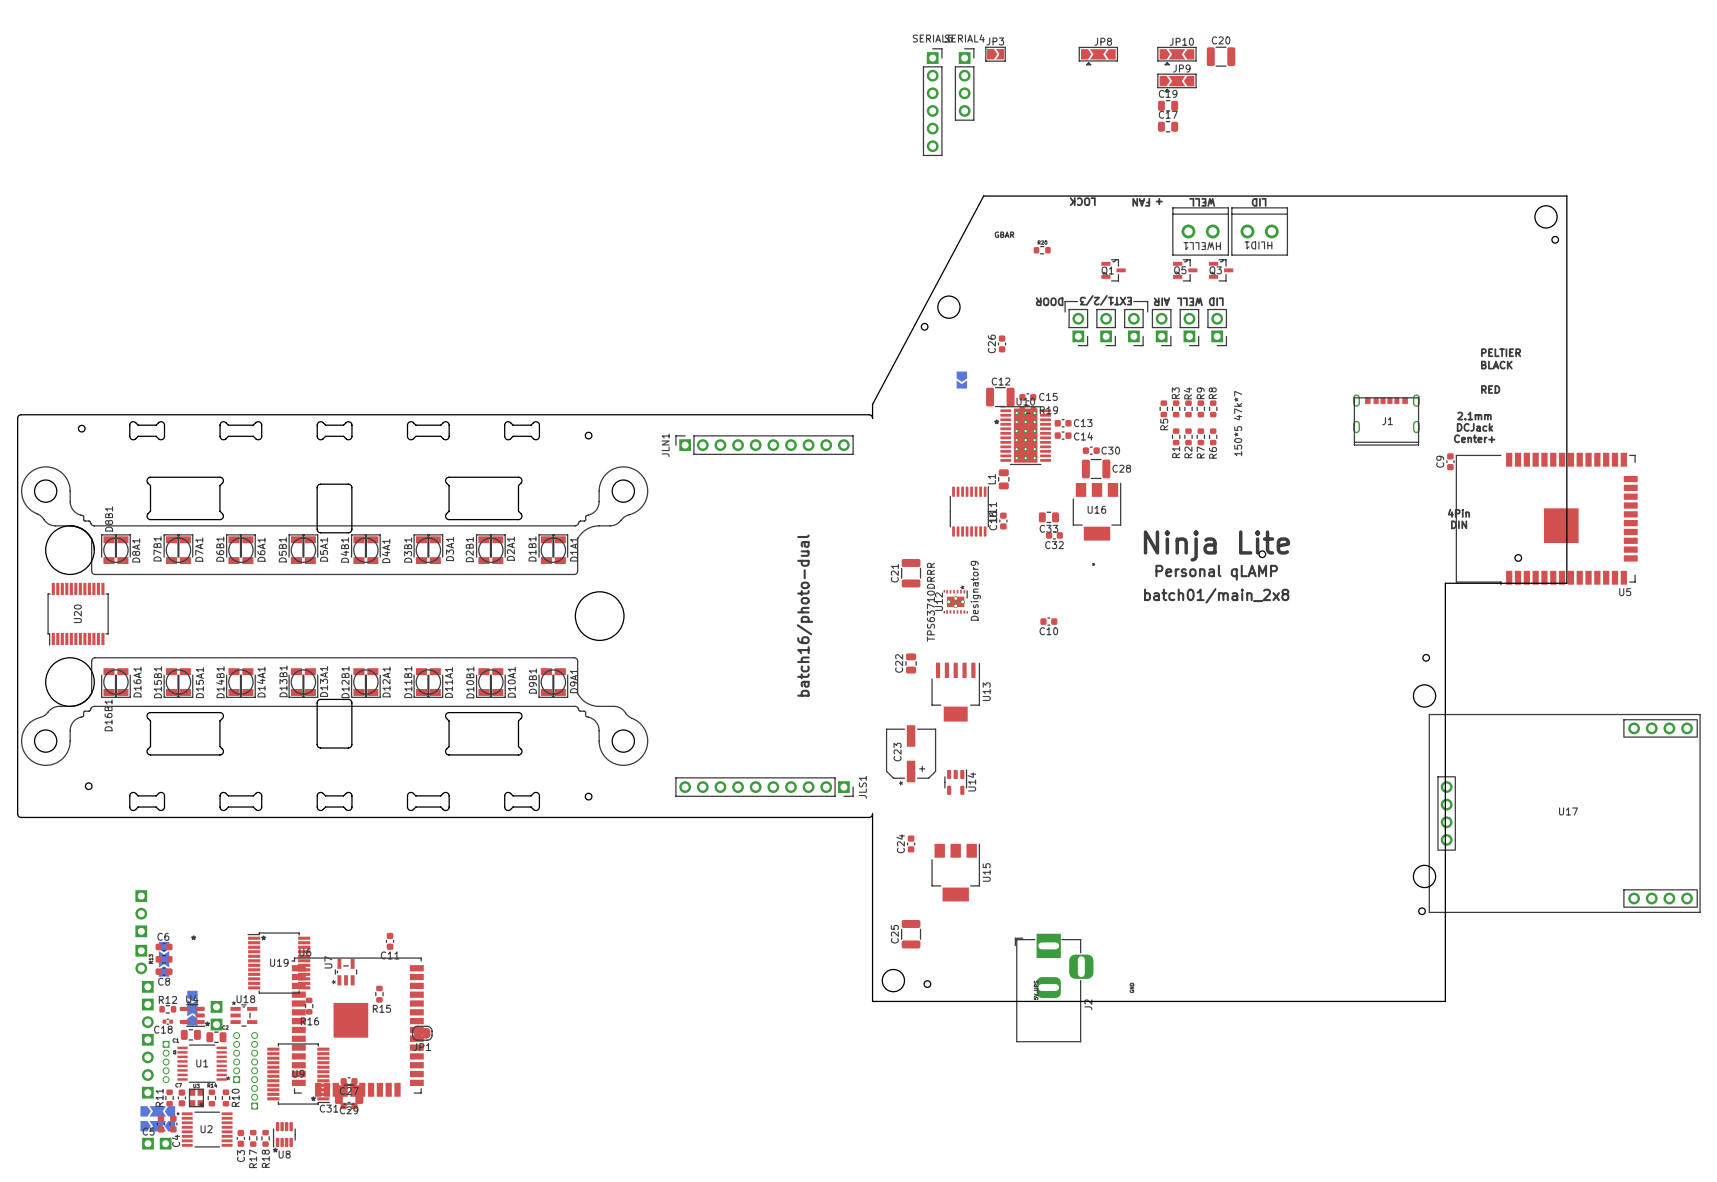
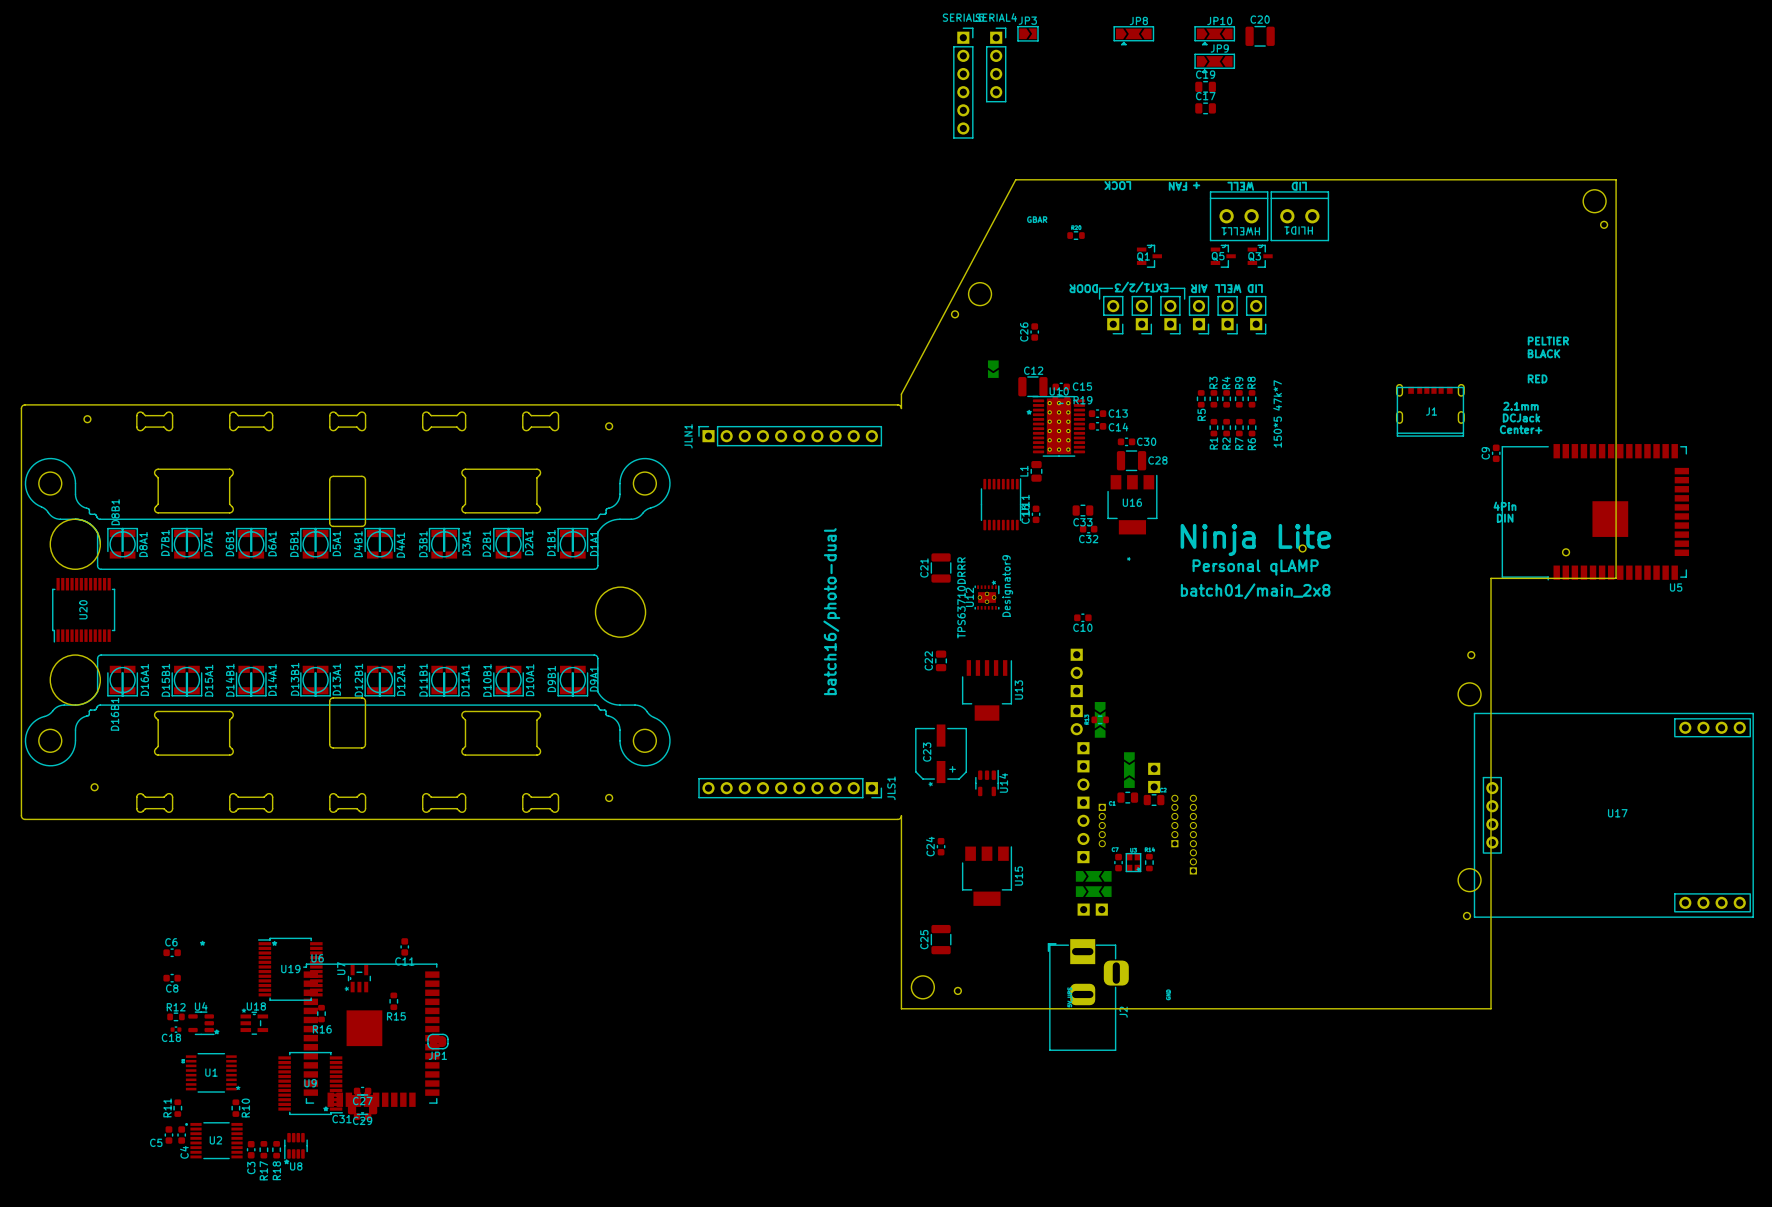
part: none -> (1076, 654)
part: none -> (1076, 681)
part: none -> (1076, 720)
part: none -> (1100, 719)
part: none -> (1083, 748)
part: none -> (1154, 768)
part: none -> (1129, 770)
part: none -> (1083, 775)
part: none -> (1154, 786)
part: none -> (1083, 811)
part: none -> (1174, 821)
part: none -> (1102, 825)
part: none -> (1193, 834)
part: none -> (1083, 848)
part: none -> (1093, 876)
part: none -> (1093, 891)
part: (141, 896) -> none
part: none -> (1083, 909)
part: none -> (1101, 909)
part: (141, 922) -> none
part: (141, 959) -> none
part position: (164, 959) -> (1100, 719)
part: (164, 959) -> none
part: (147, 986) -> none
part: (216, 1006) -> none
part: (192, 1008) -> none
part: (147, 1013) -> none
part: (216, 1024) -> none
part position: (190, 1034) -> (1127, 797)
part position: (216, 1037) -> (1154, 800)
part: (147, 1048) -> none
part: (236, 1057) -> none
part: (166, 1061) -> none
part: (254, 1070) -> none
part: (147, 1083) -> none
part position: (181, 1097) -> (1118, 862)
part position: (196, 1097) -> (1133, 862)
part position: (211, 1097) -> (1149, 862)
part: (157, 1111) -> none
part: (157, 1126) -> none
part: (148, 1143) -> none
part: (165, 1143) -> none

